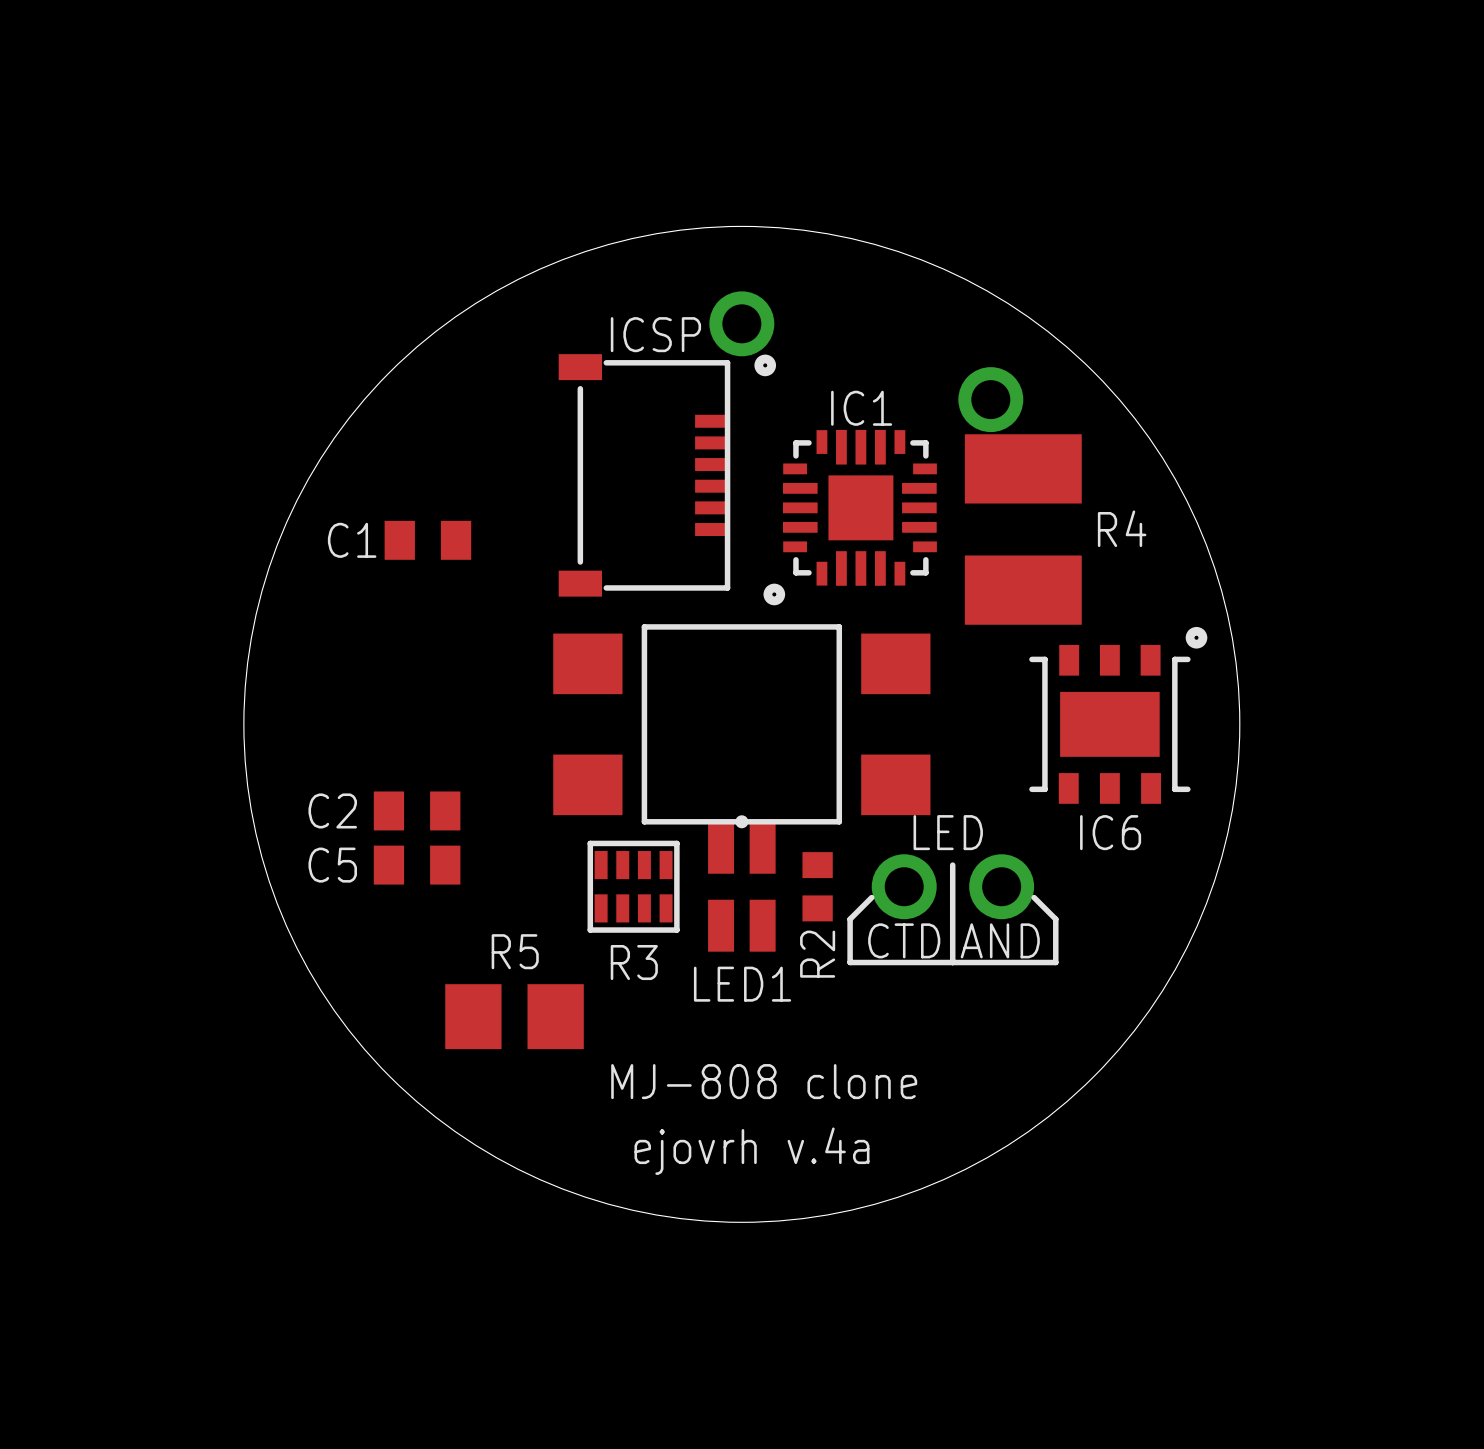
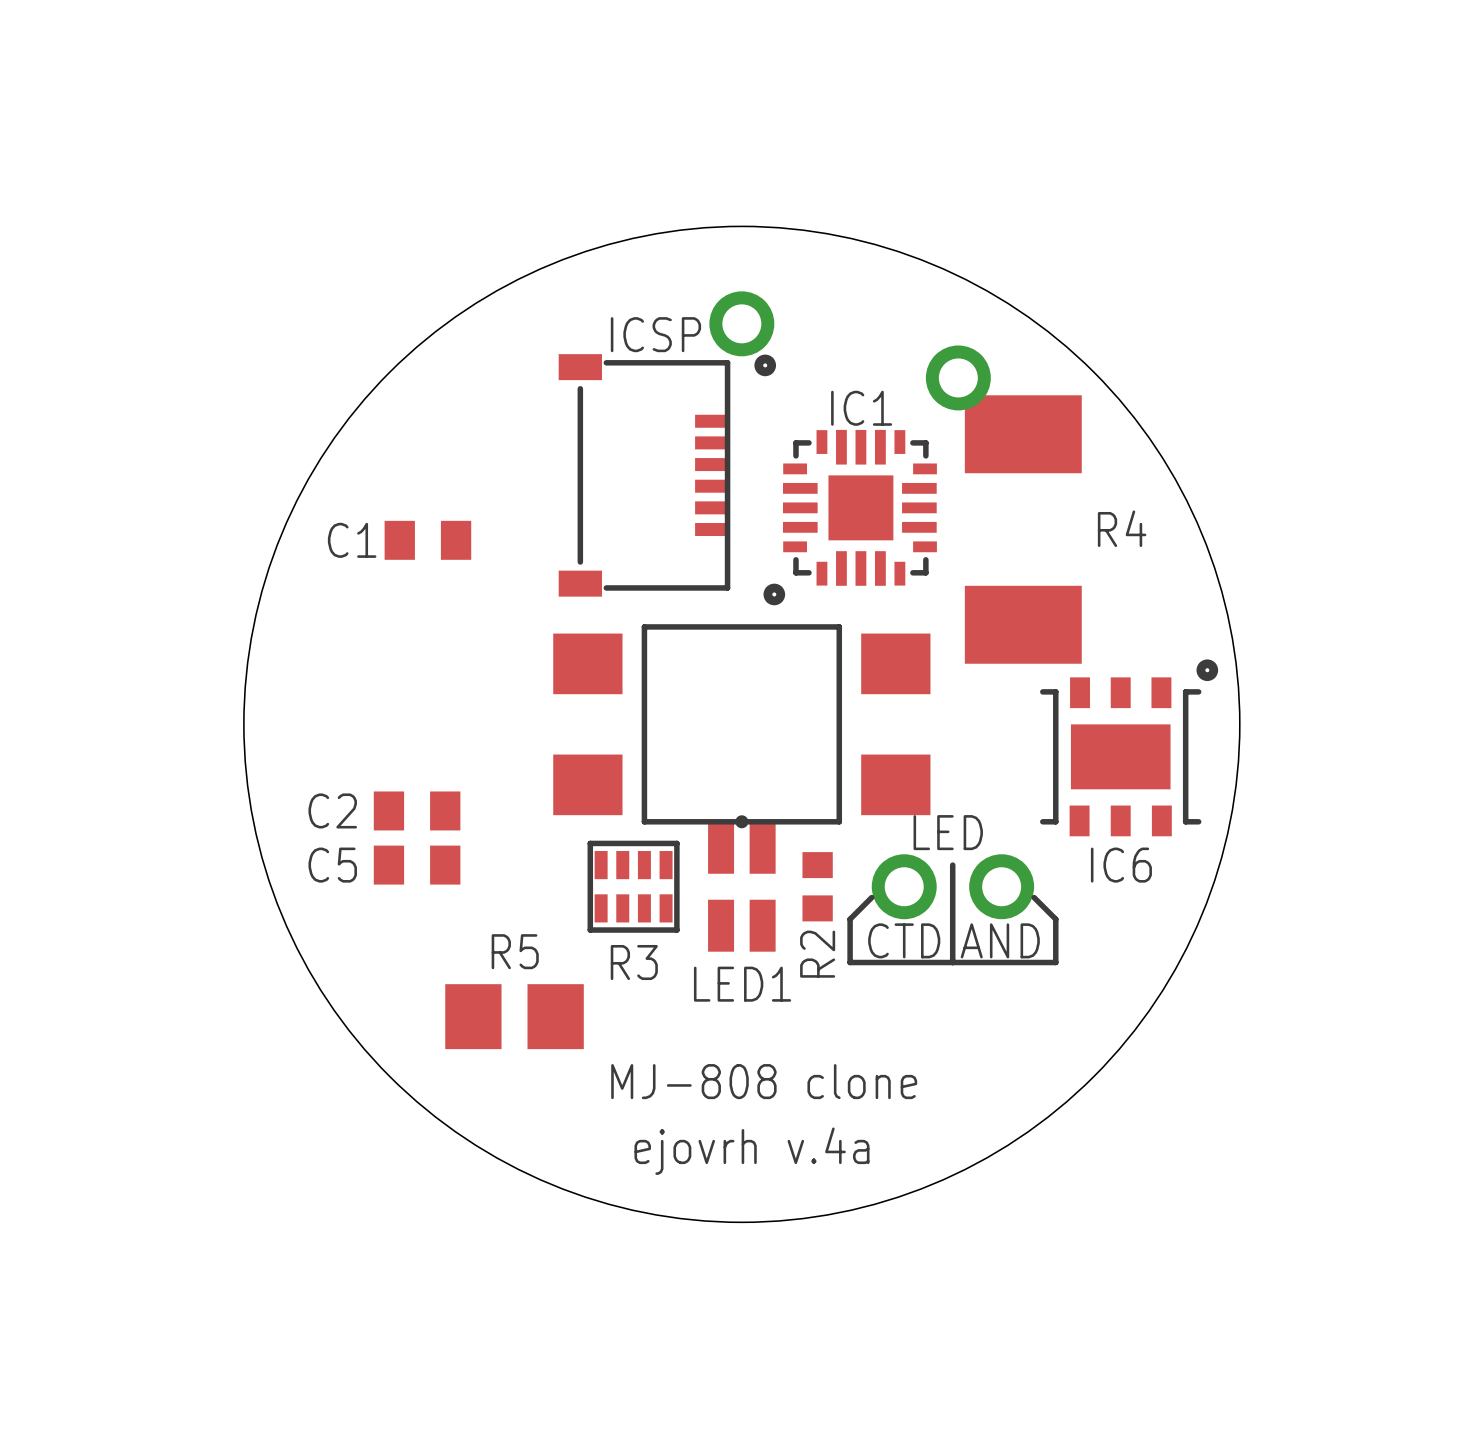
part position: (990, 399) -> (958, 377)
R4 footprint: [964, 434, 1082, 625] -> [964, 395, 1082, 664]
IC6 position: (1118, 715) -> (1129, 747)

